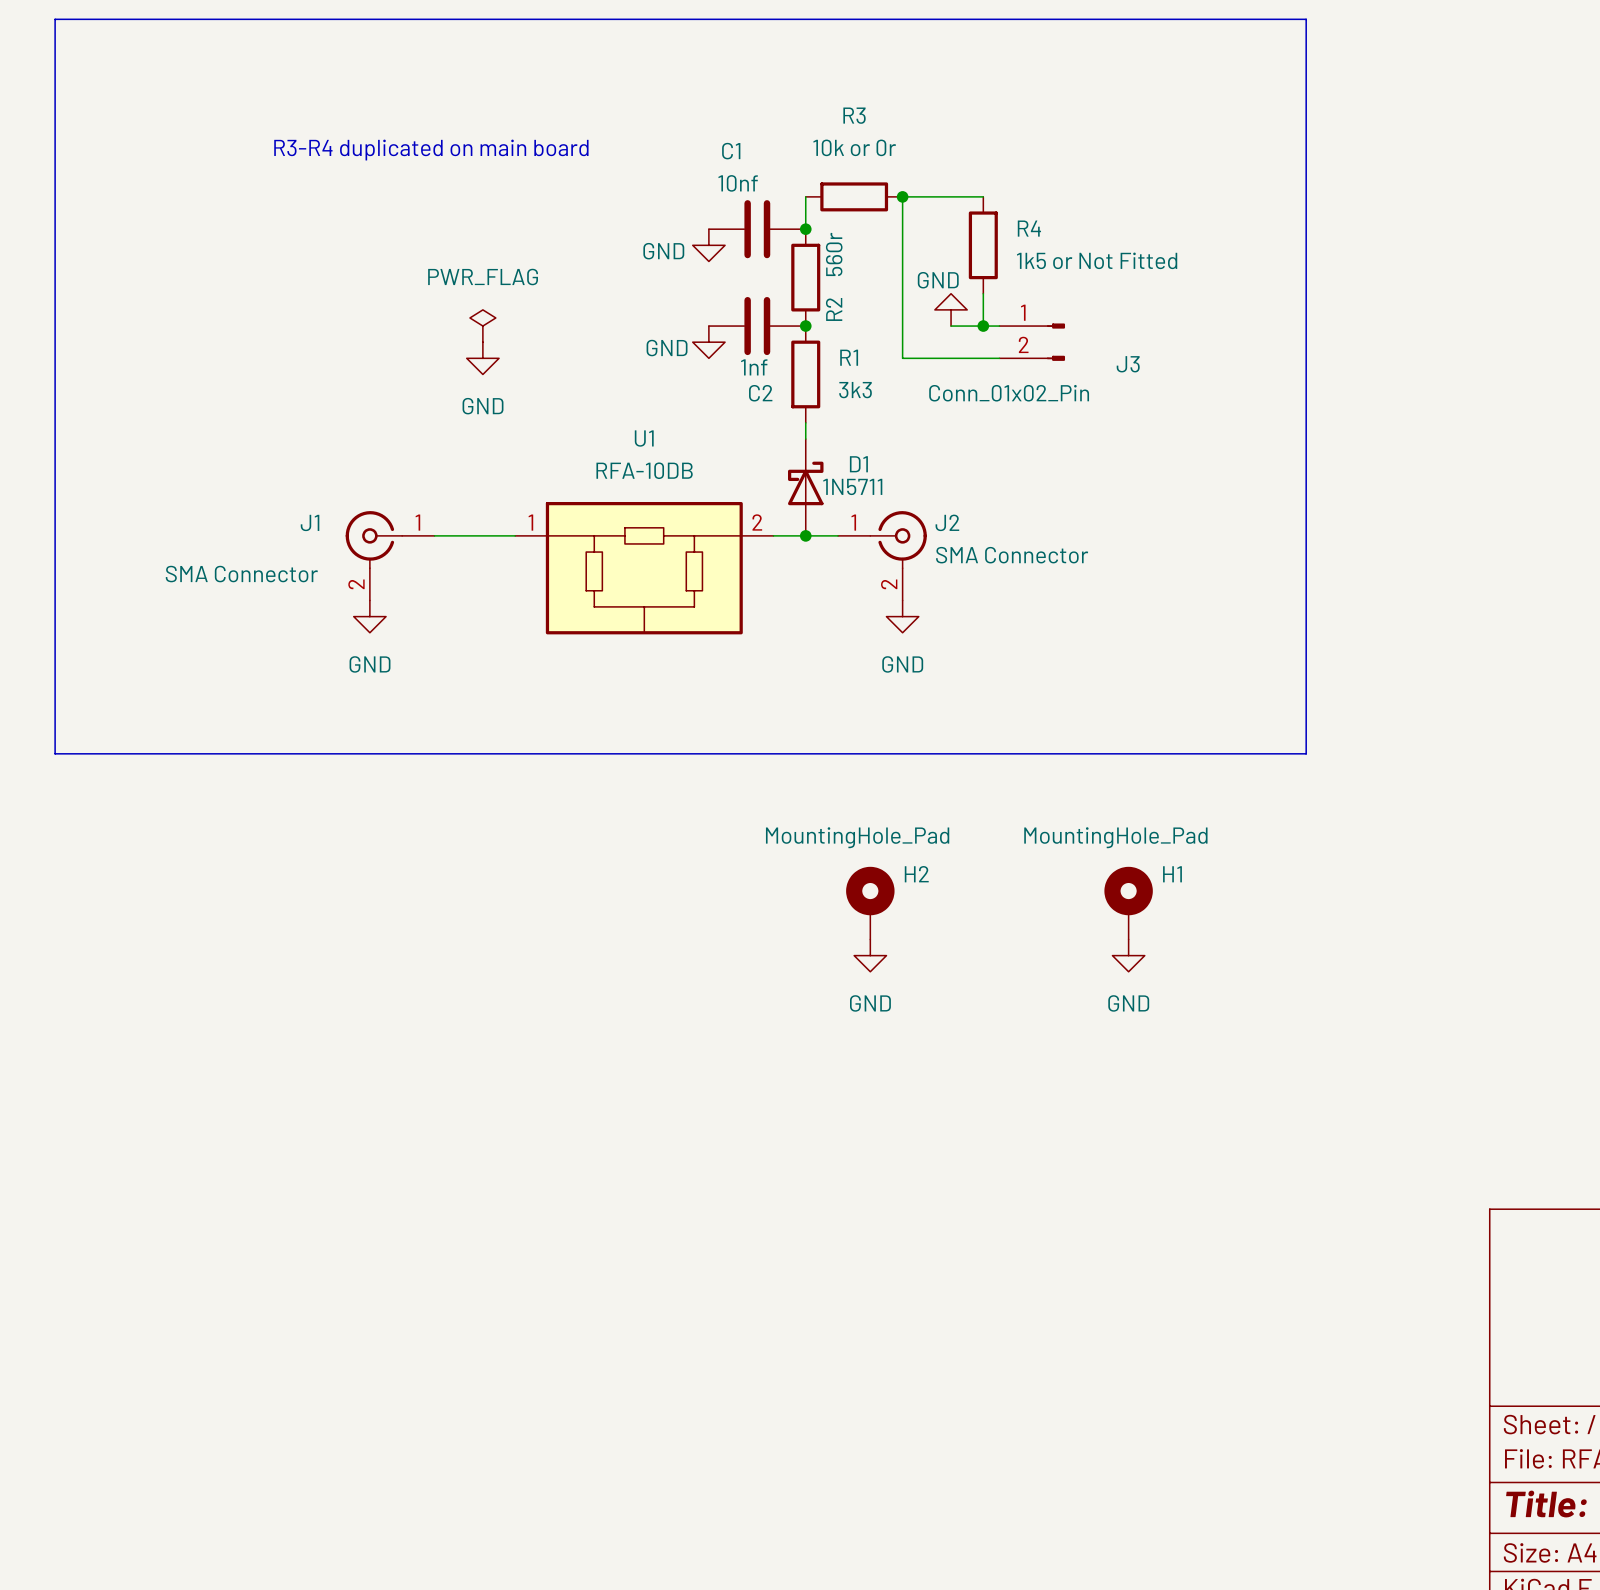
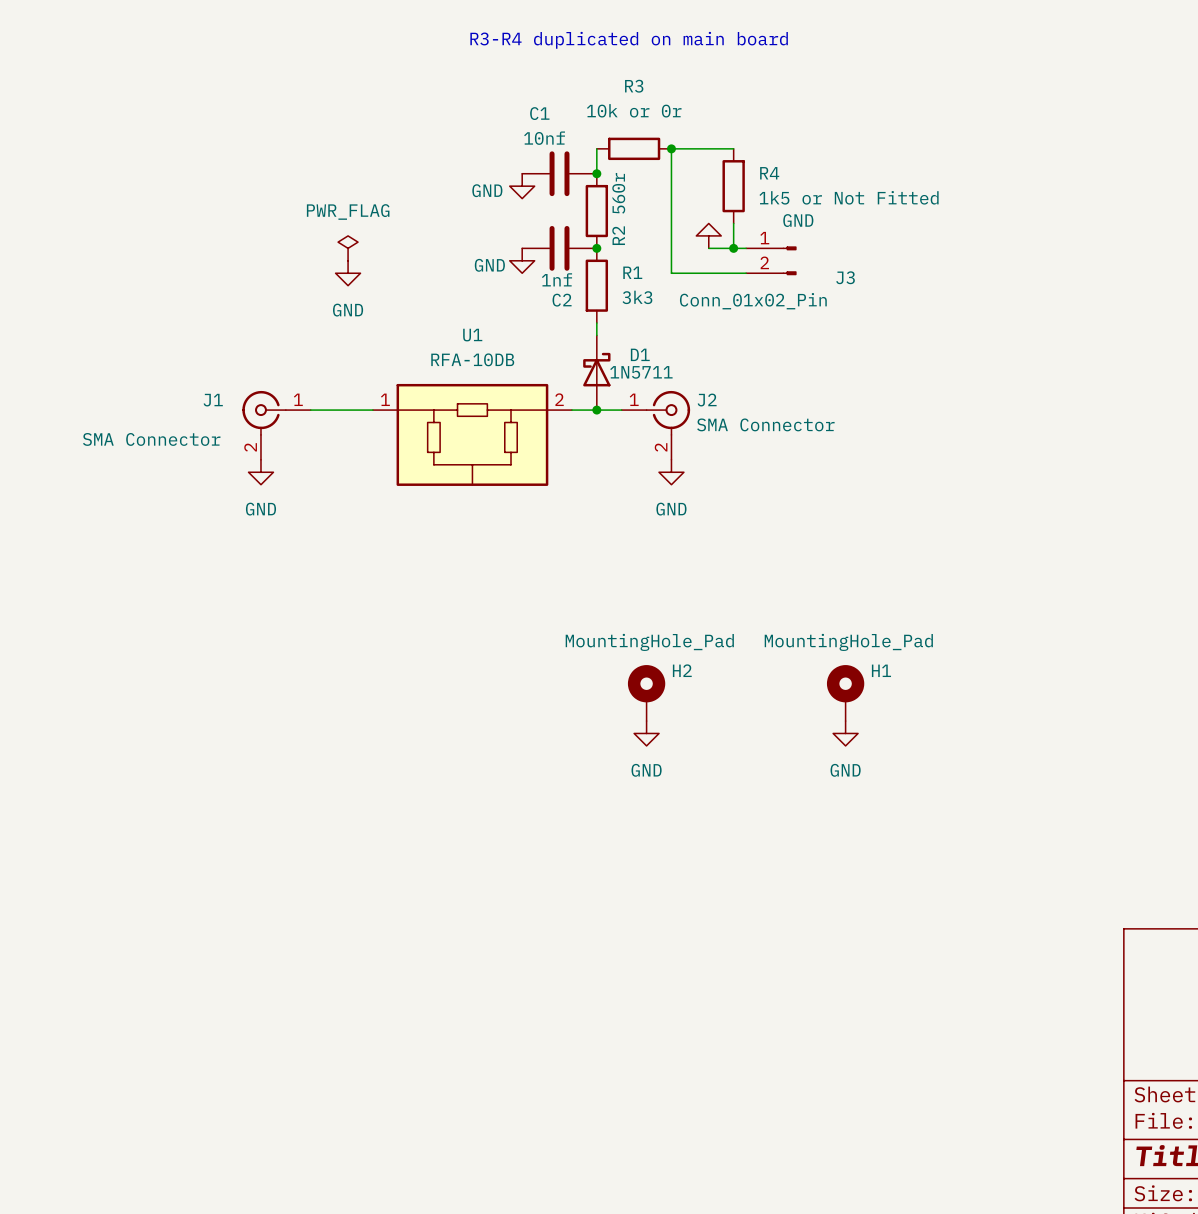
line: (55, 19) (1306, 19) (1306, 753) (55, 753) (55, 19) -> none
text: none -> R3-R4 duplicated on main board (629, 40)
text: R3-R4 duplicated on main board (431, 150) -> none
power symbol text position: GND (938, 280) -> GND (798, 220)

